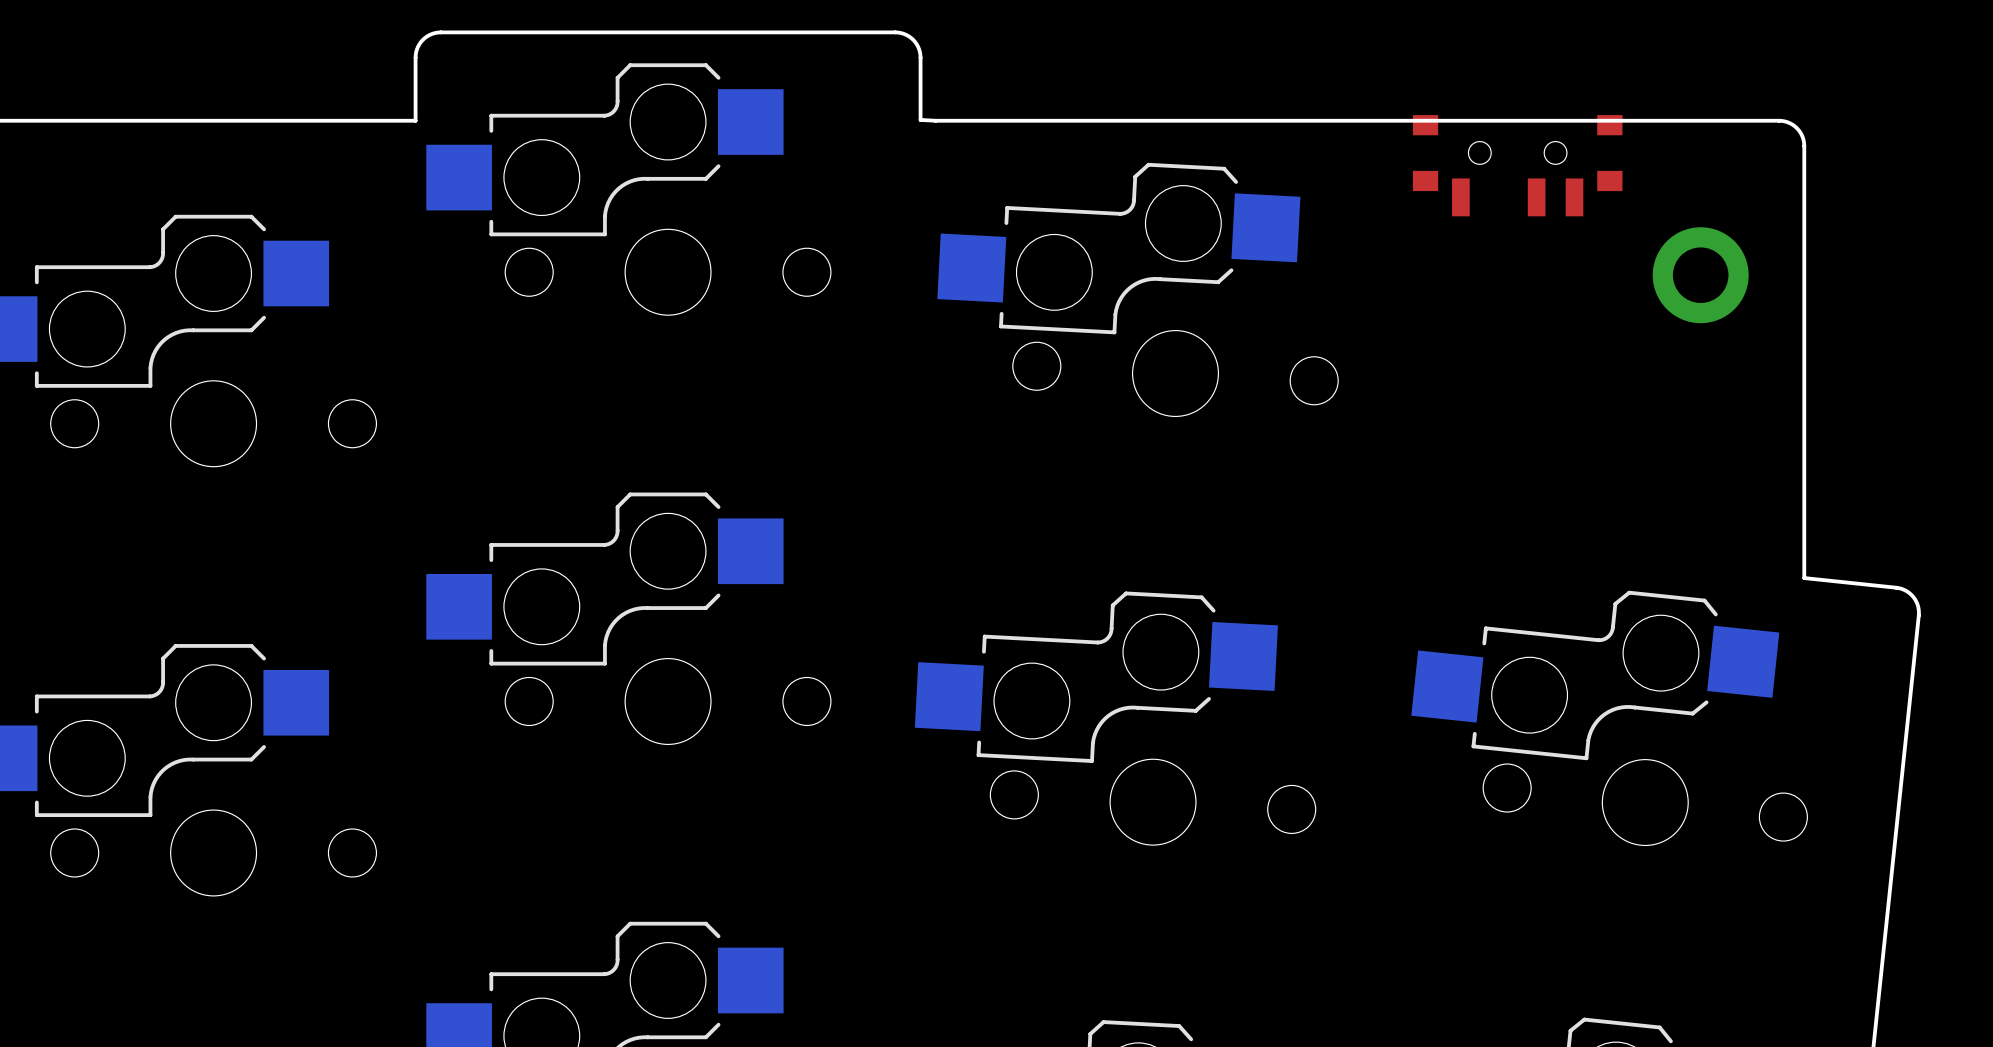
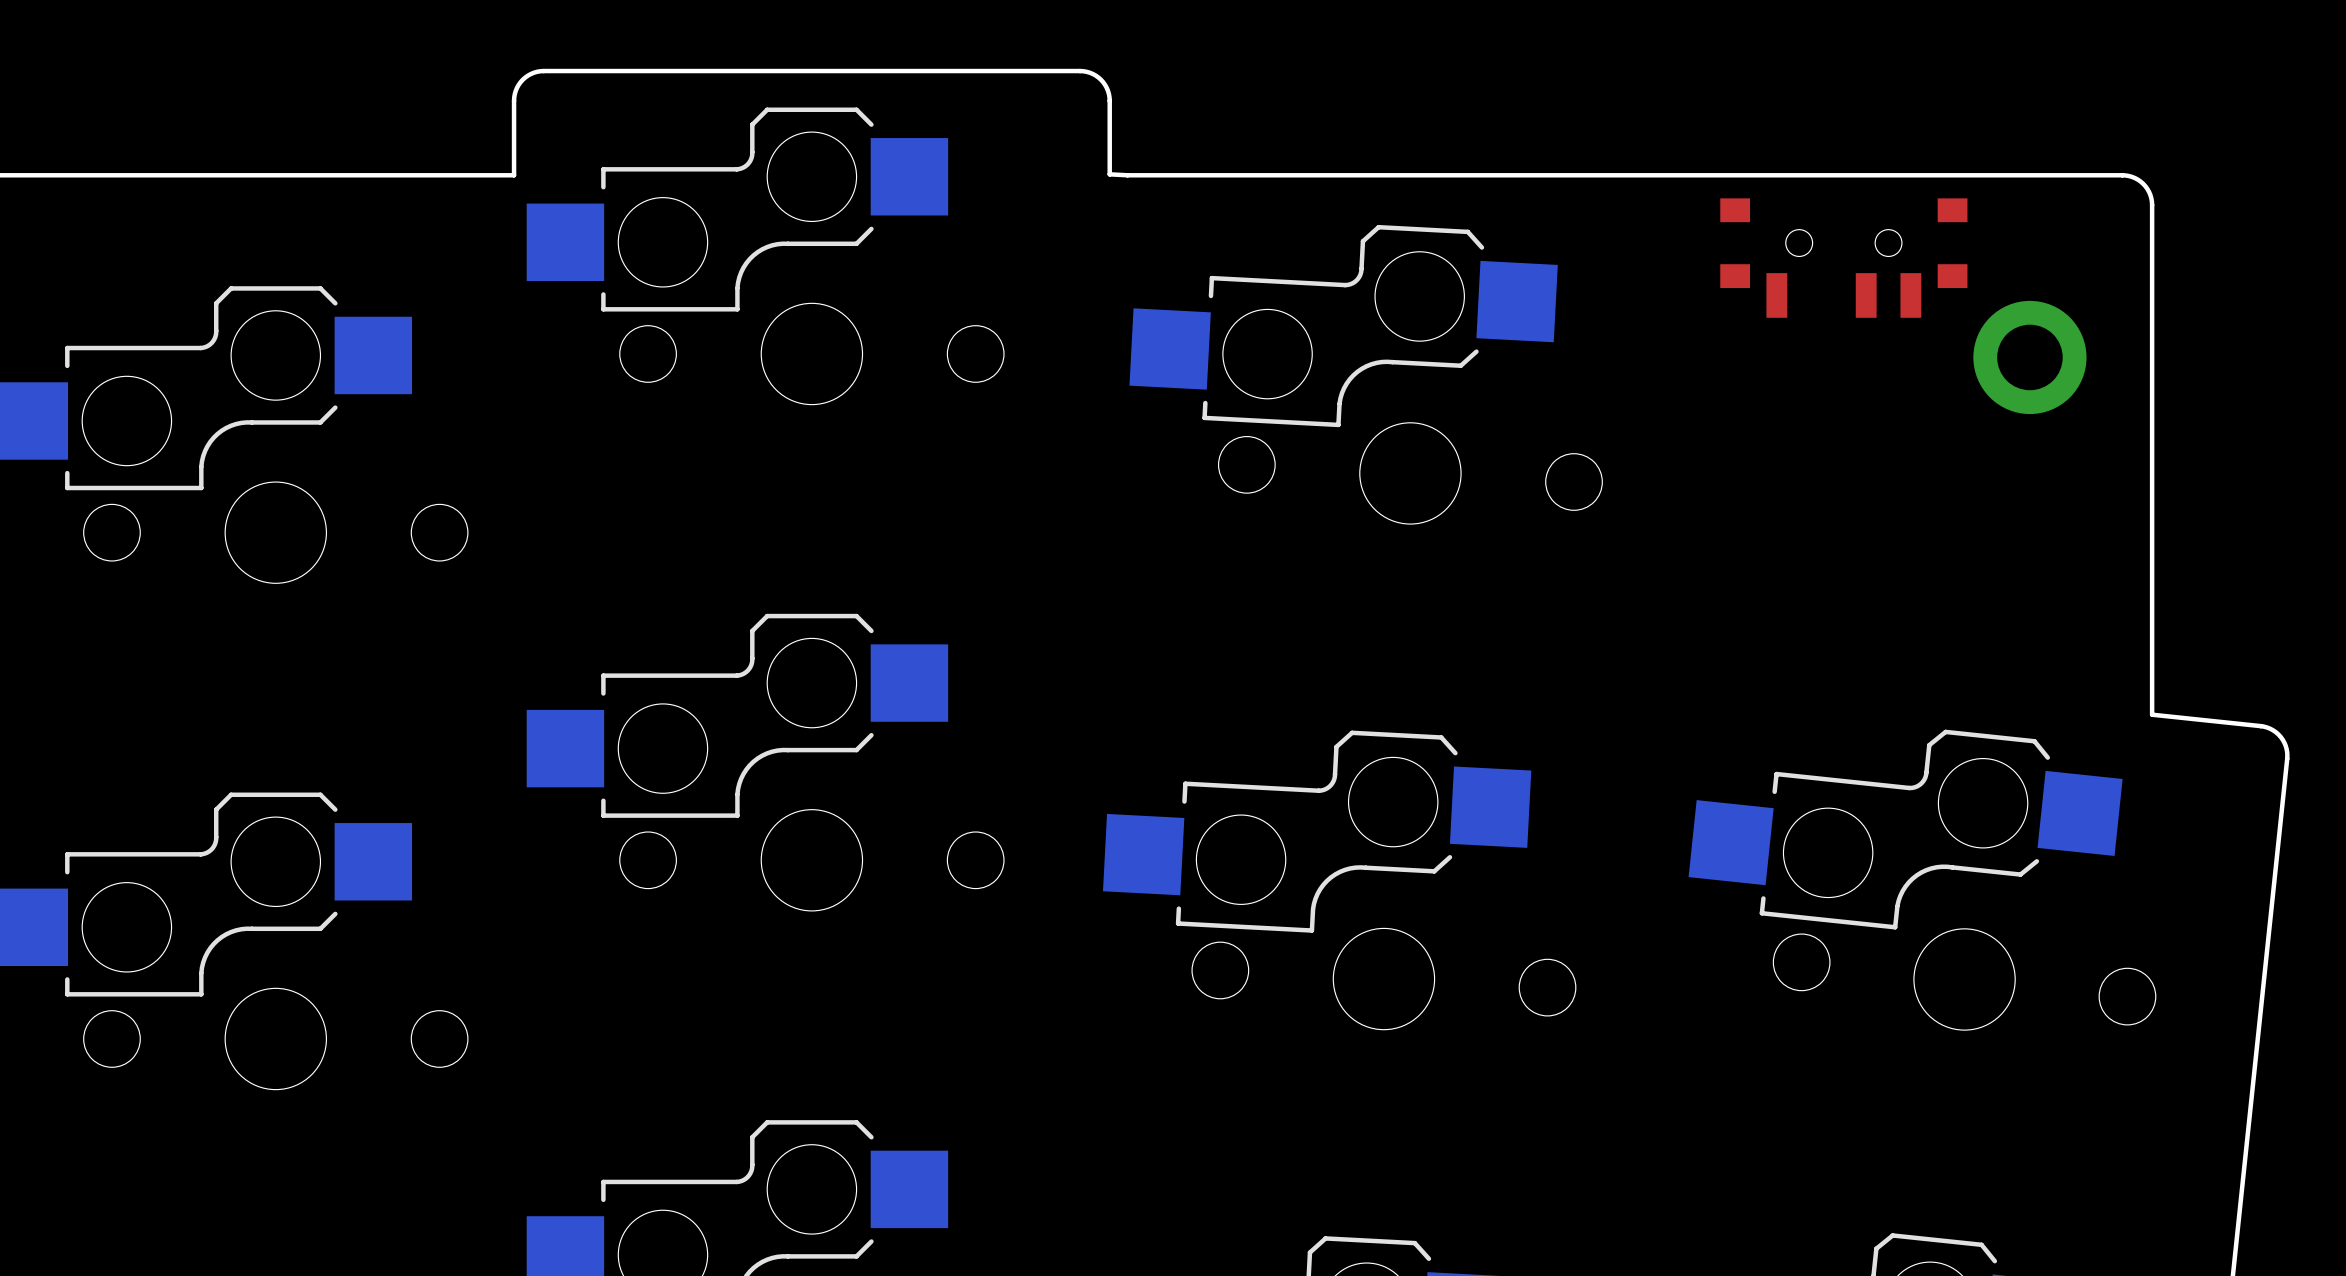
part position: (1517, 165) -> (1843, 258)

